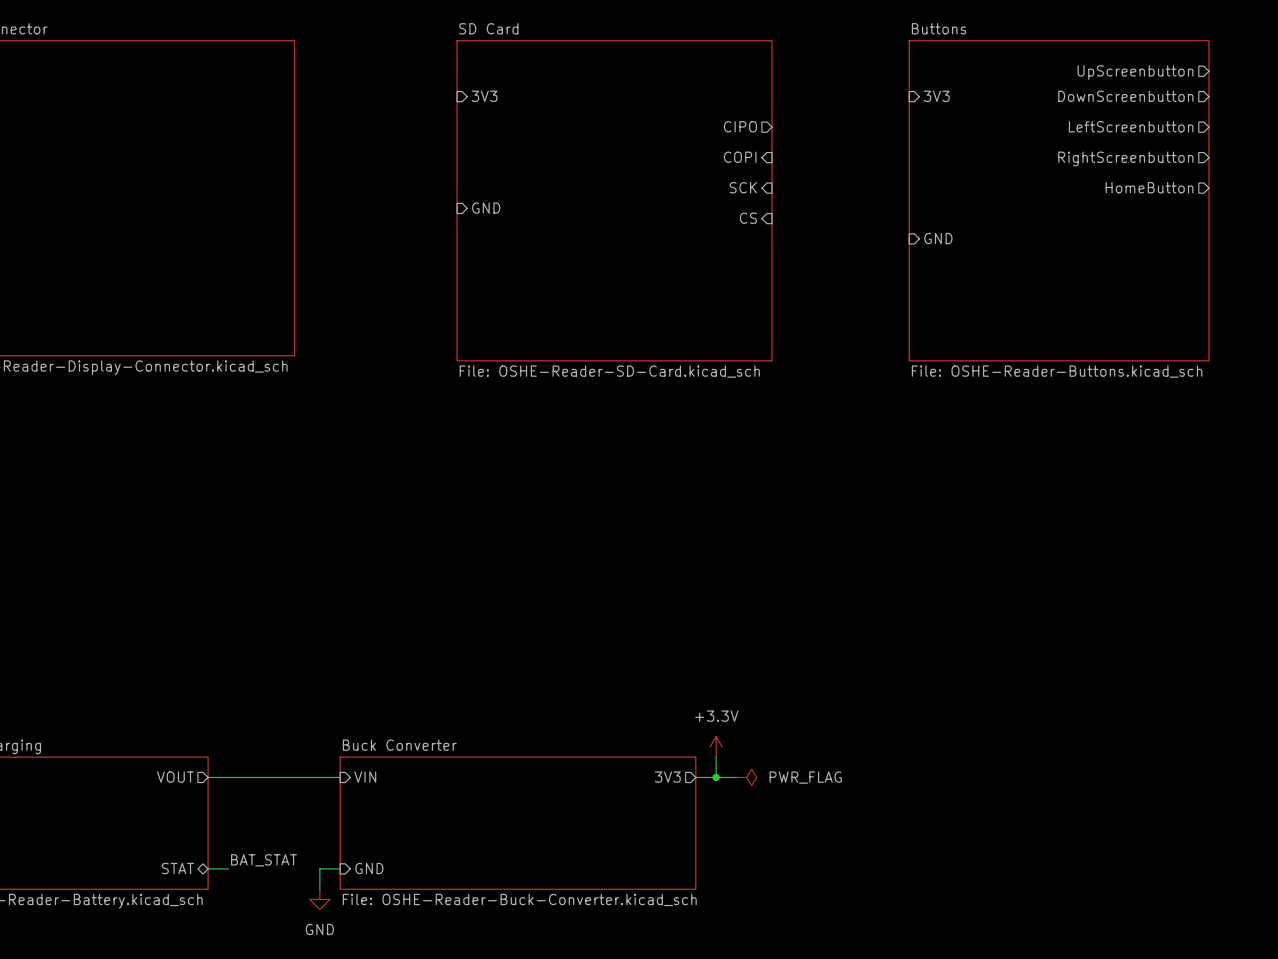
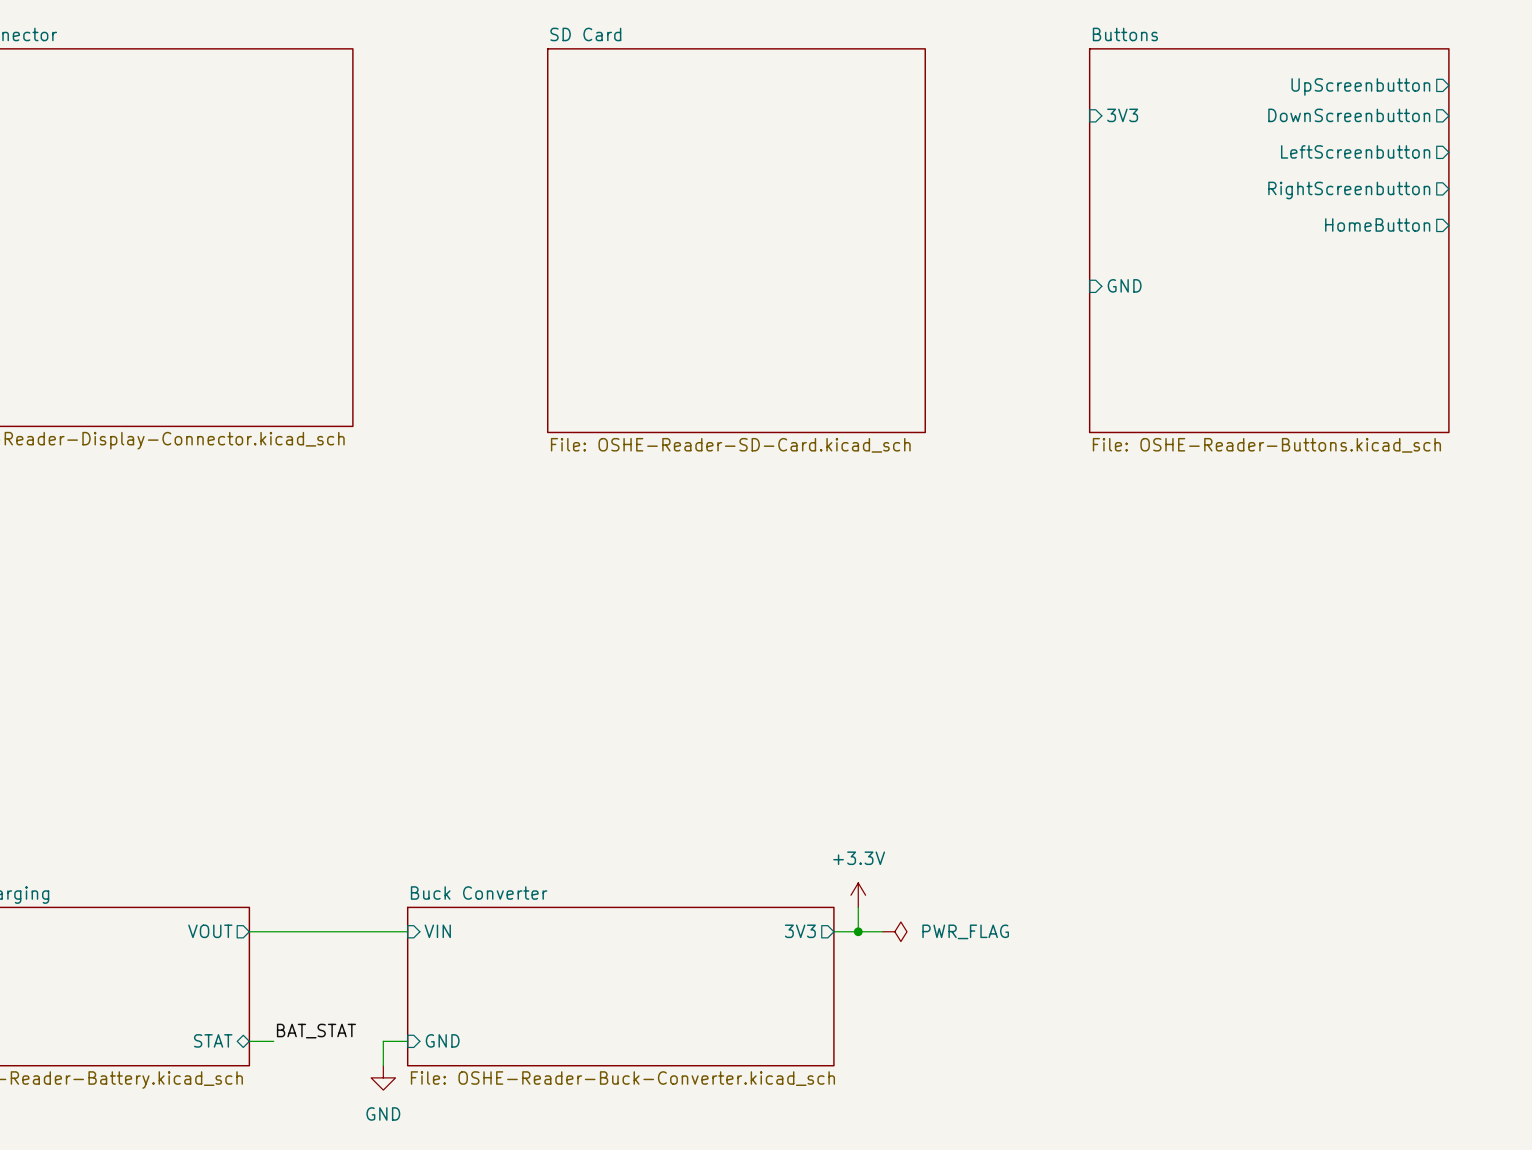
sheet pin: 3V3 (484, 96) -> none
sheet pin: CIPO (740, 126) -> none
sheet pin: COPI (740, 157) -> none
sheet pin: SCK (743, 187) -> none
sheet pin: GND (486, 208) -> none
sheet pin: CS (748, 218) -> none

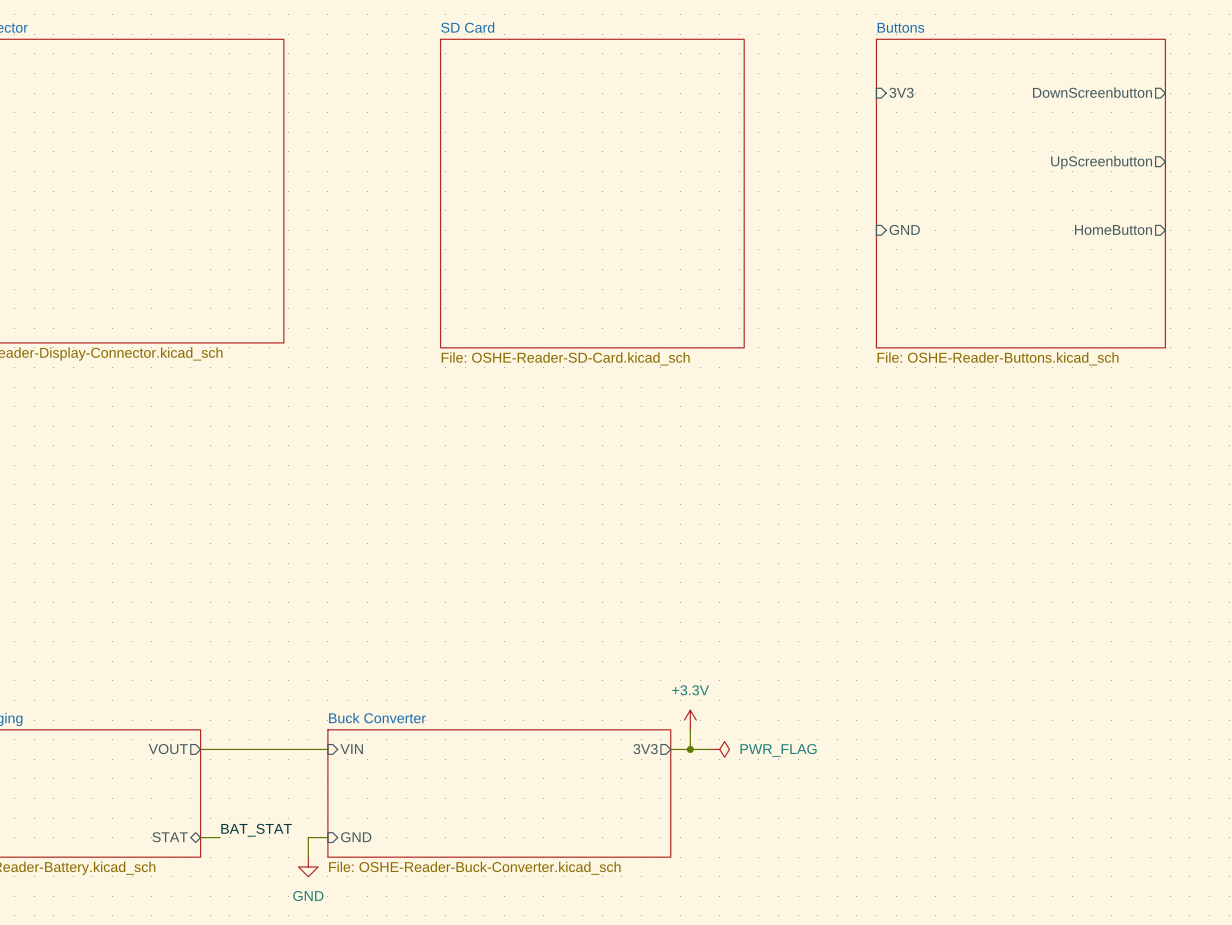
sheet pin position: UpScreenbutton (1360, 86) -> UpScreenbutton (1101, 162)
sheet pin: LeftScreenbutton (1355, 151) -> none
sheet pin: RightScreenbutton (1349, 190) -> none
sheet pin position: HomeButton (1377, 224) -> HomeButton (1113, 230)

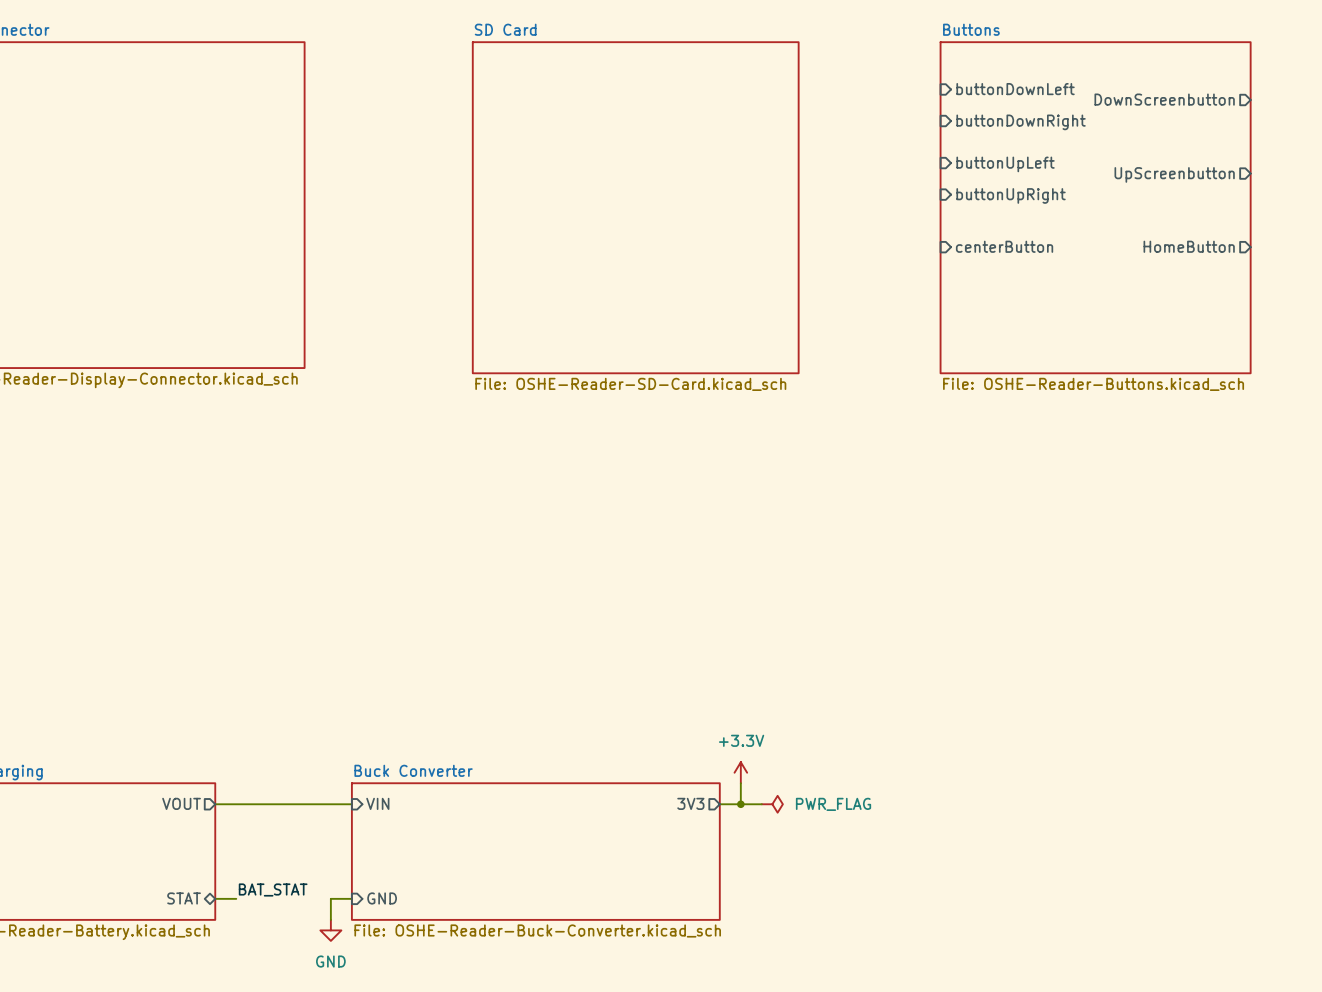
sheet pin: none -> buttonDownLeft (1015, 89)
sheet pin: 3V3 (901, 92) -> none
sheet pin: none -> buttonDownRight (1021, 122)
sheet pin: none -> buttonUpLeft (1005, 164)
sheet pin: none -> buttonUpRight (1011, 195)
sheet pin: GND (904, 229) -> centerButton (1004, 246)

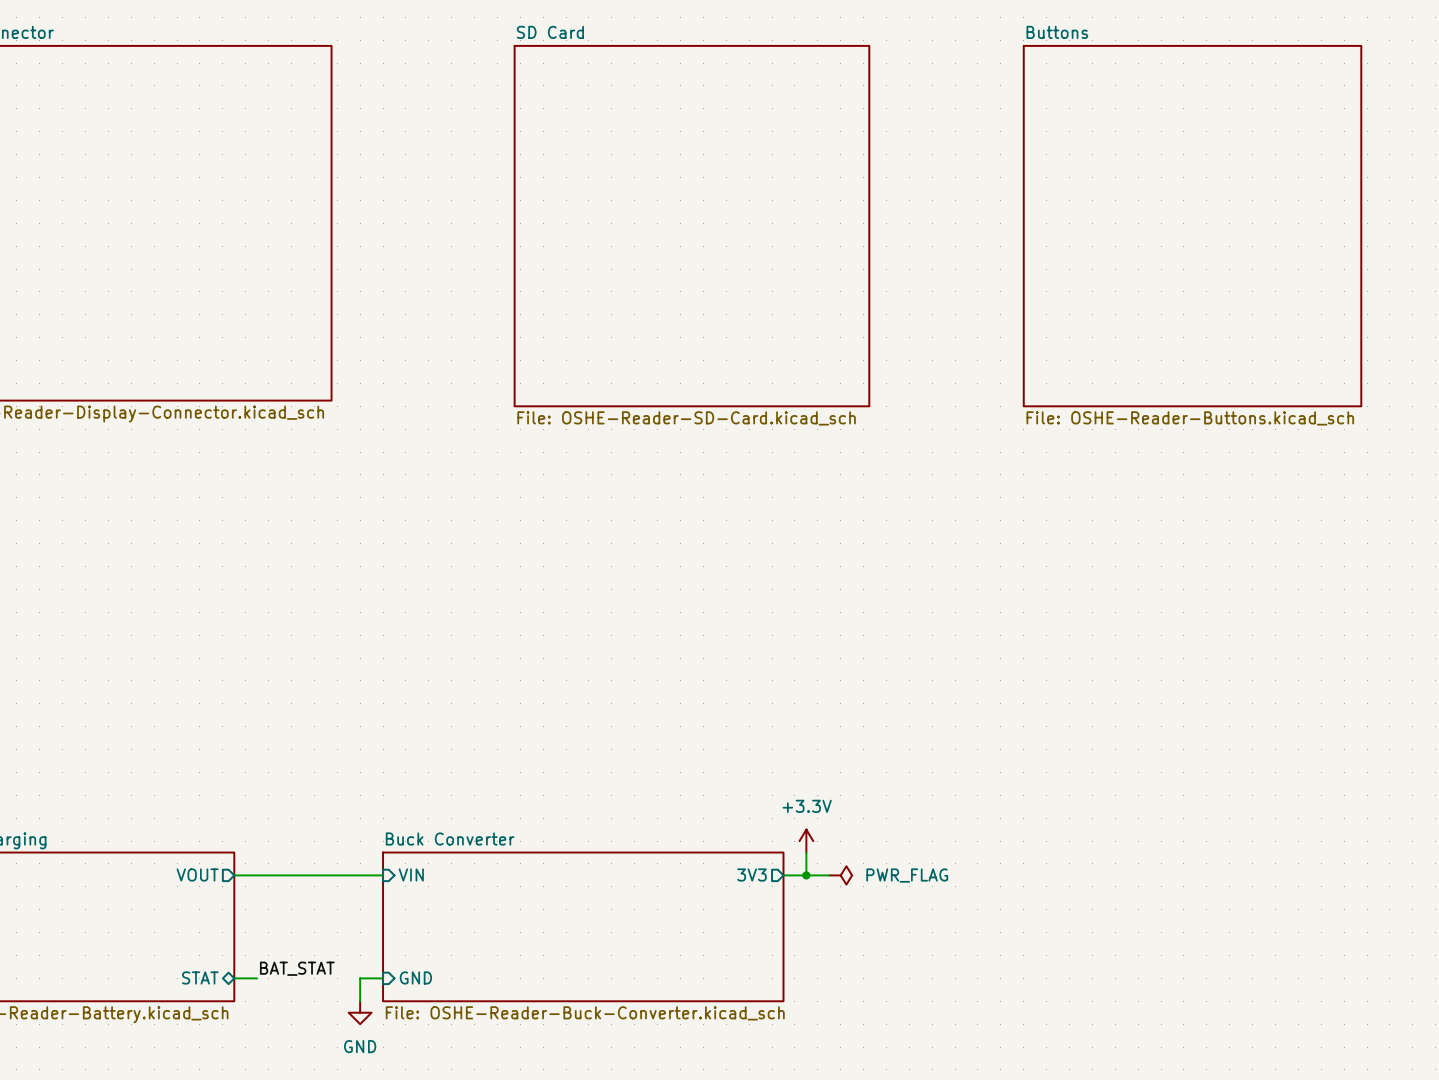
sheet pin: buttonDownLeft (1015, 89) -> none
sheet pin: DownScreenbutton (1164, 99) -> none
sheet pin: buttonDownRight (1021, 122) -> none
sheet pin: buttonUpLeft (1005, 164) -> none
sheet pin: UpScreenbutton (1174, 174) -> none
sheet pin: buttonUpRight (1011, 195) -> none
sheet pin: centerButton (1004, 246) -> none
sheet pin: HomeButton (1189, 246) -> none

